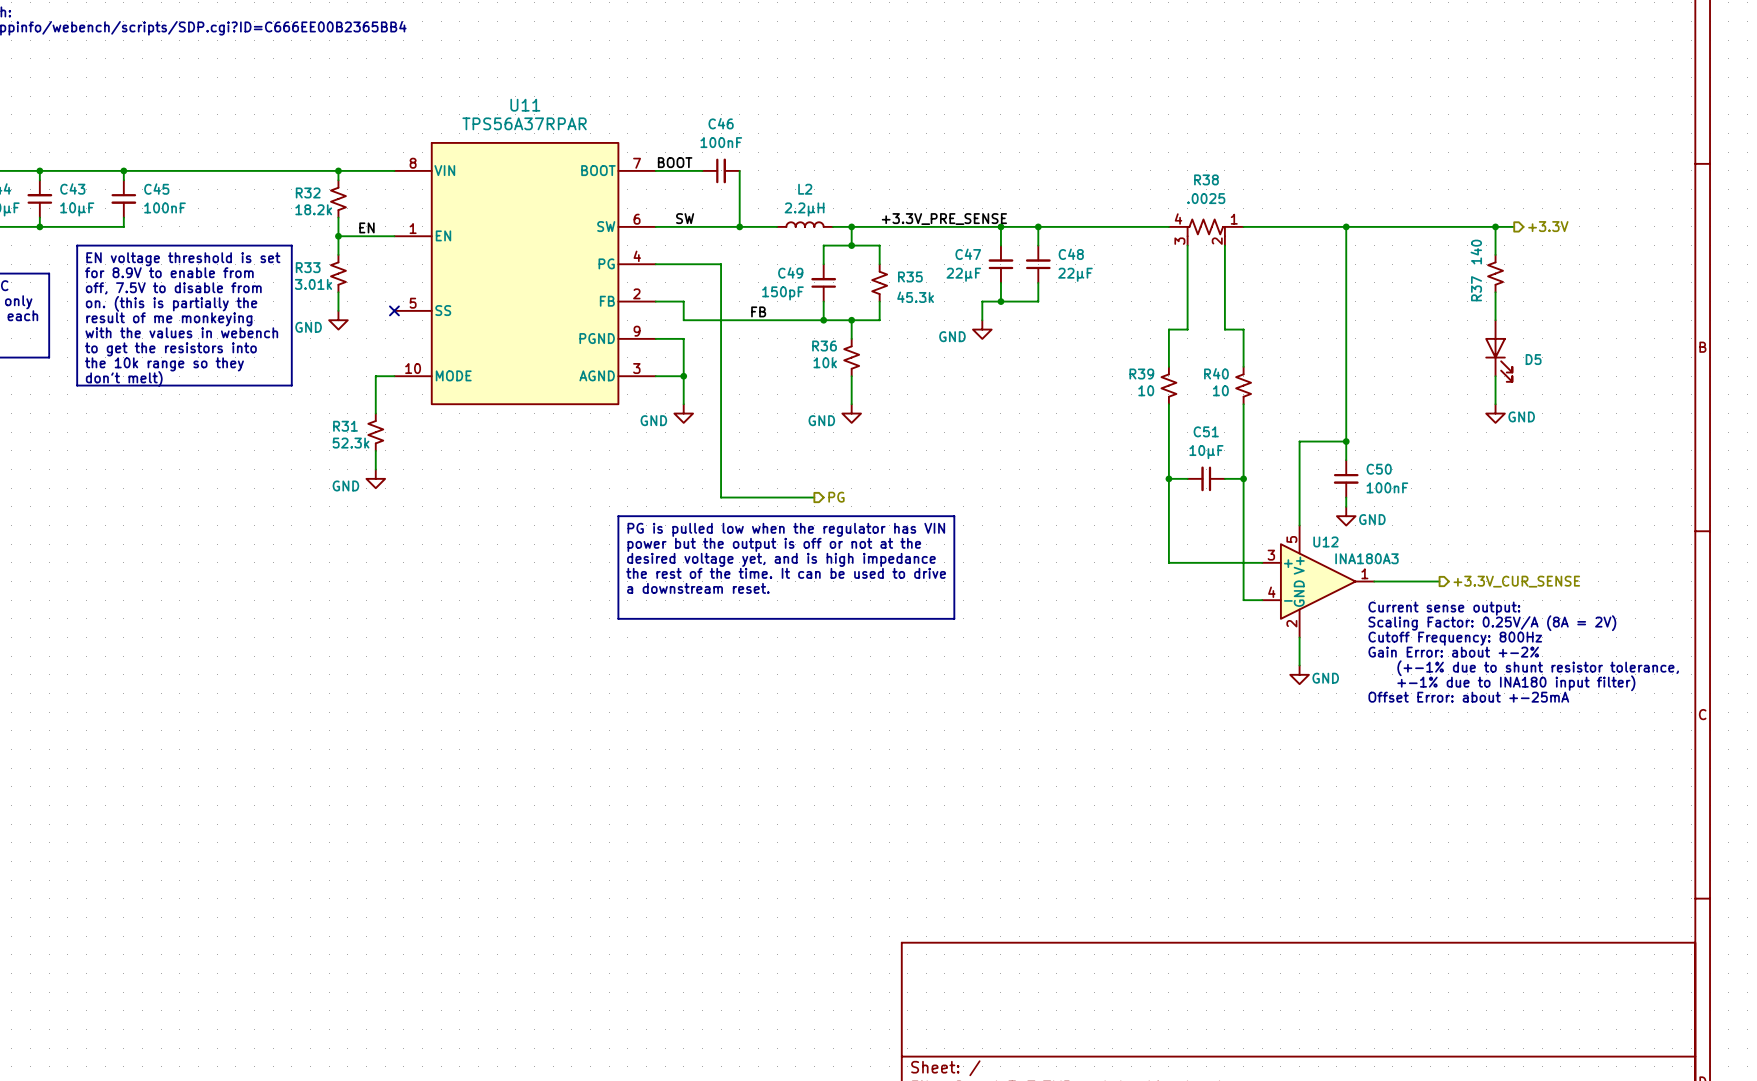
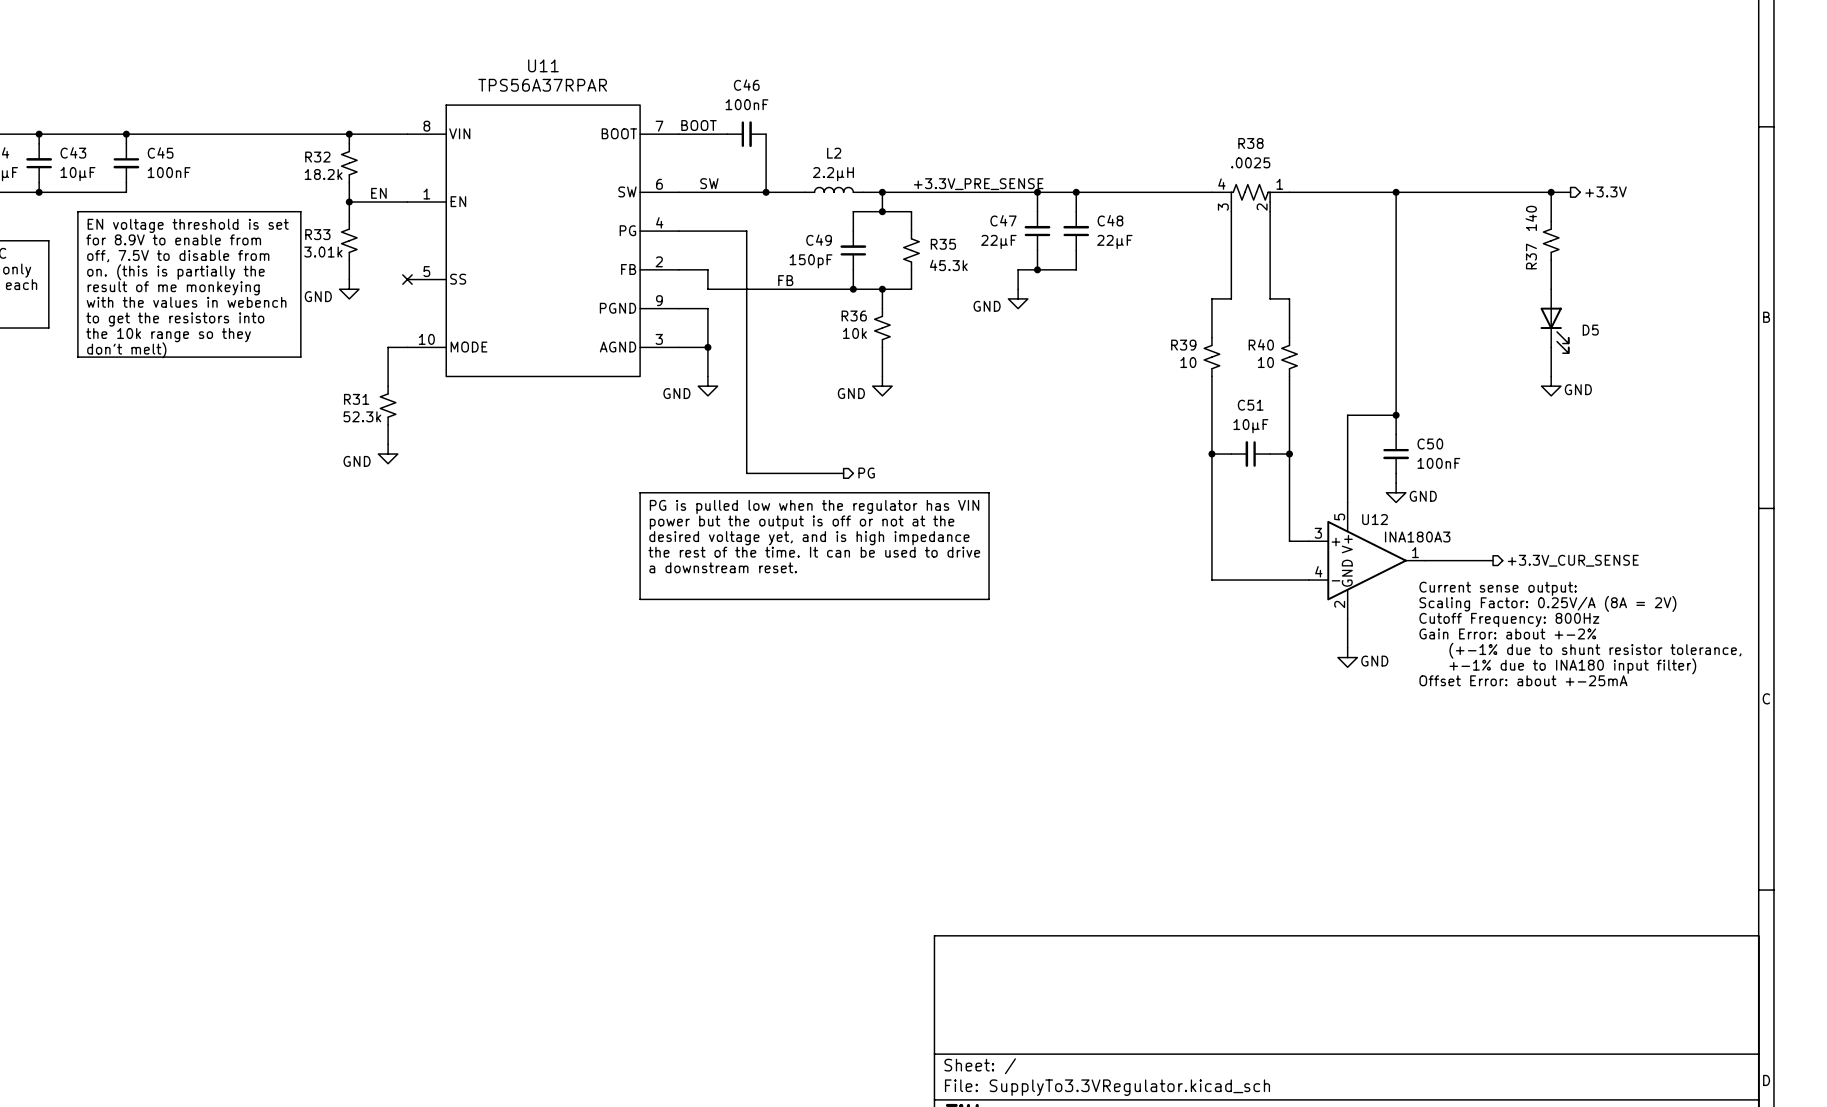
wire: (1168, 562) (1243, 562) (1243, 600) -> (1211, 541) (1211, 580) (1289, 580)

